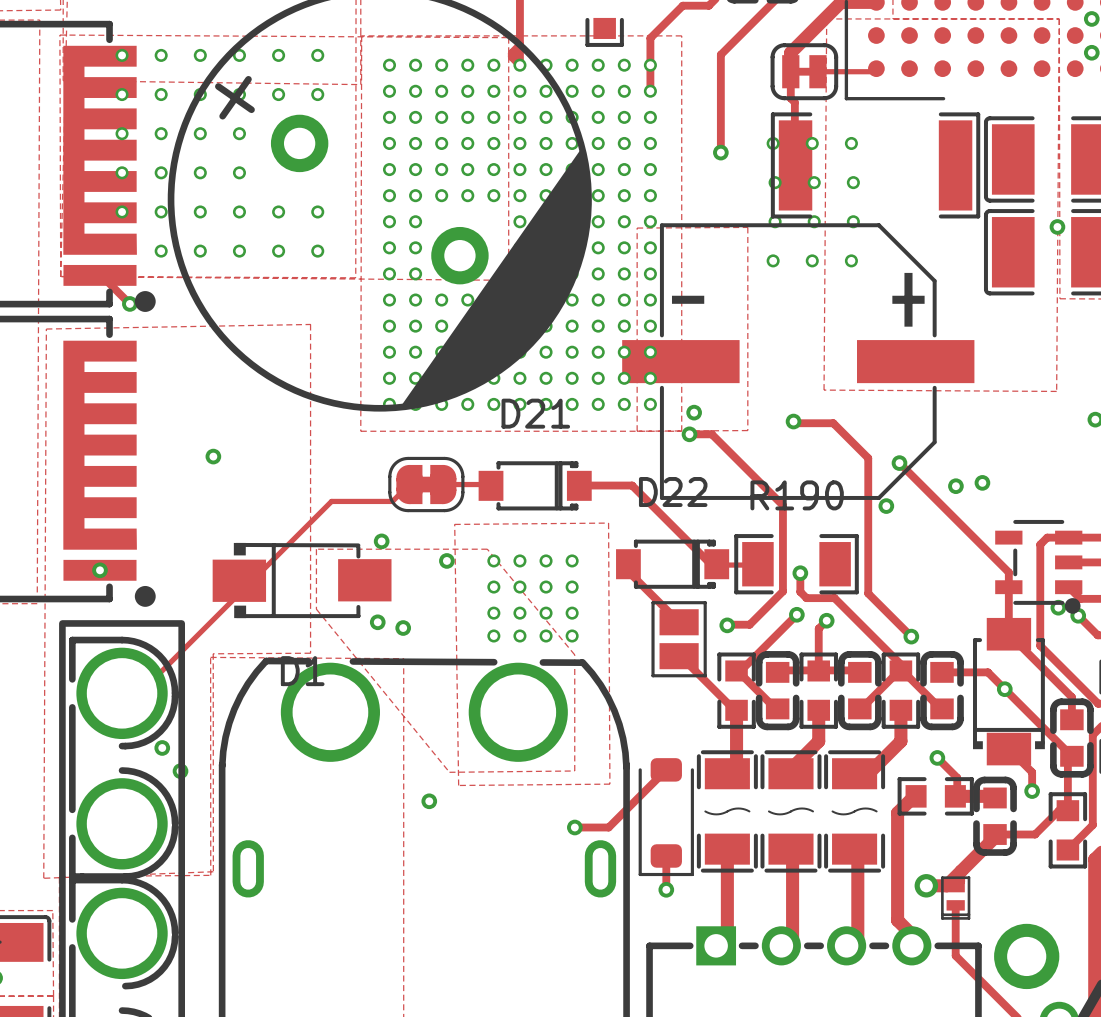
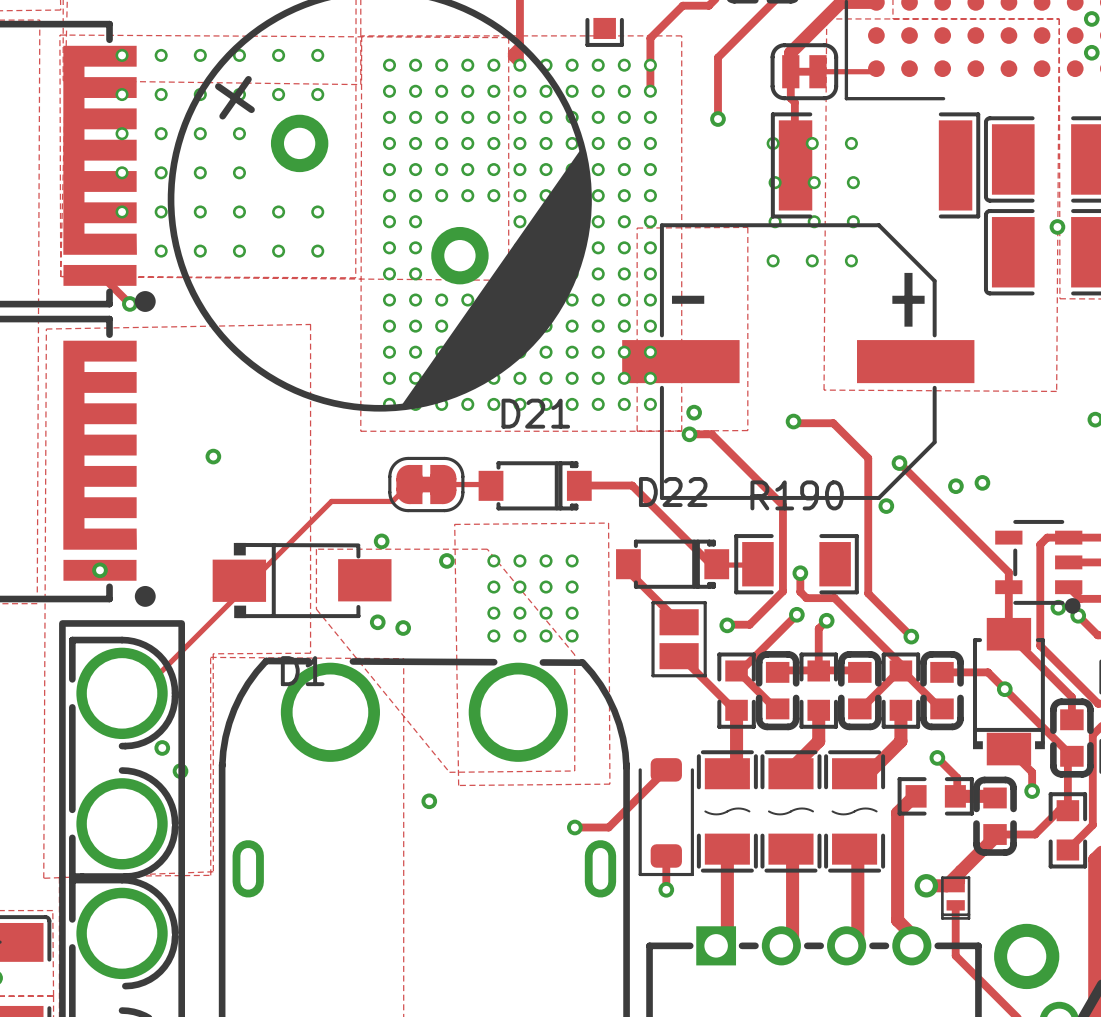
track: (720, 54) (720, 152) -> (720, 54) (718, 57) (718, 119)
via position: (720, 152) -> (718, 119)

